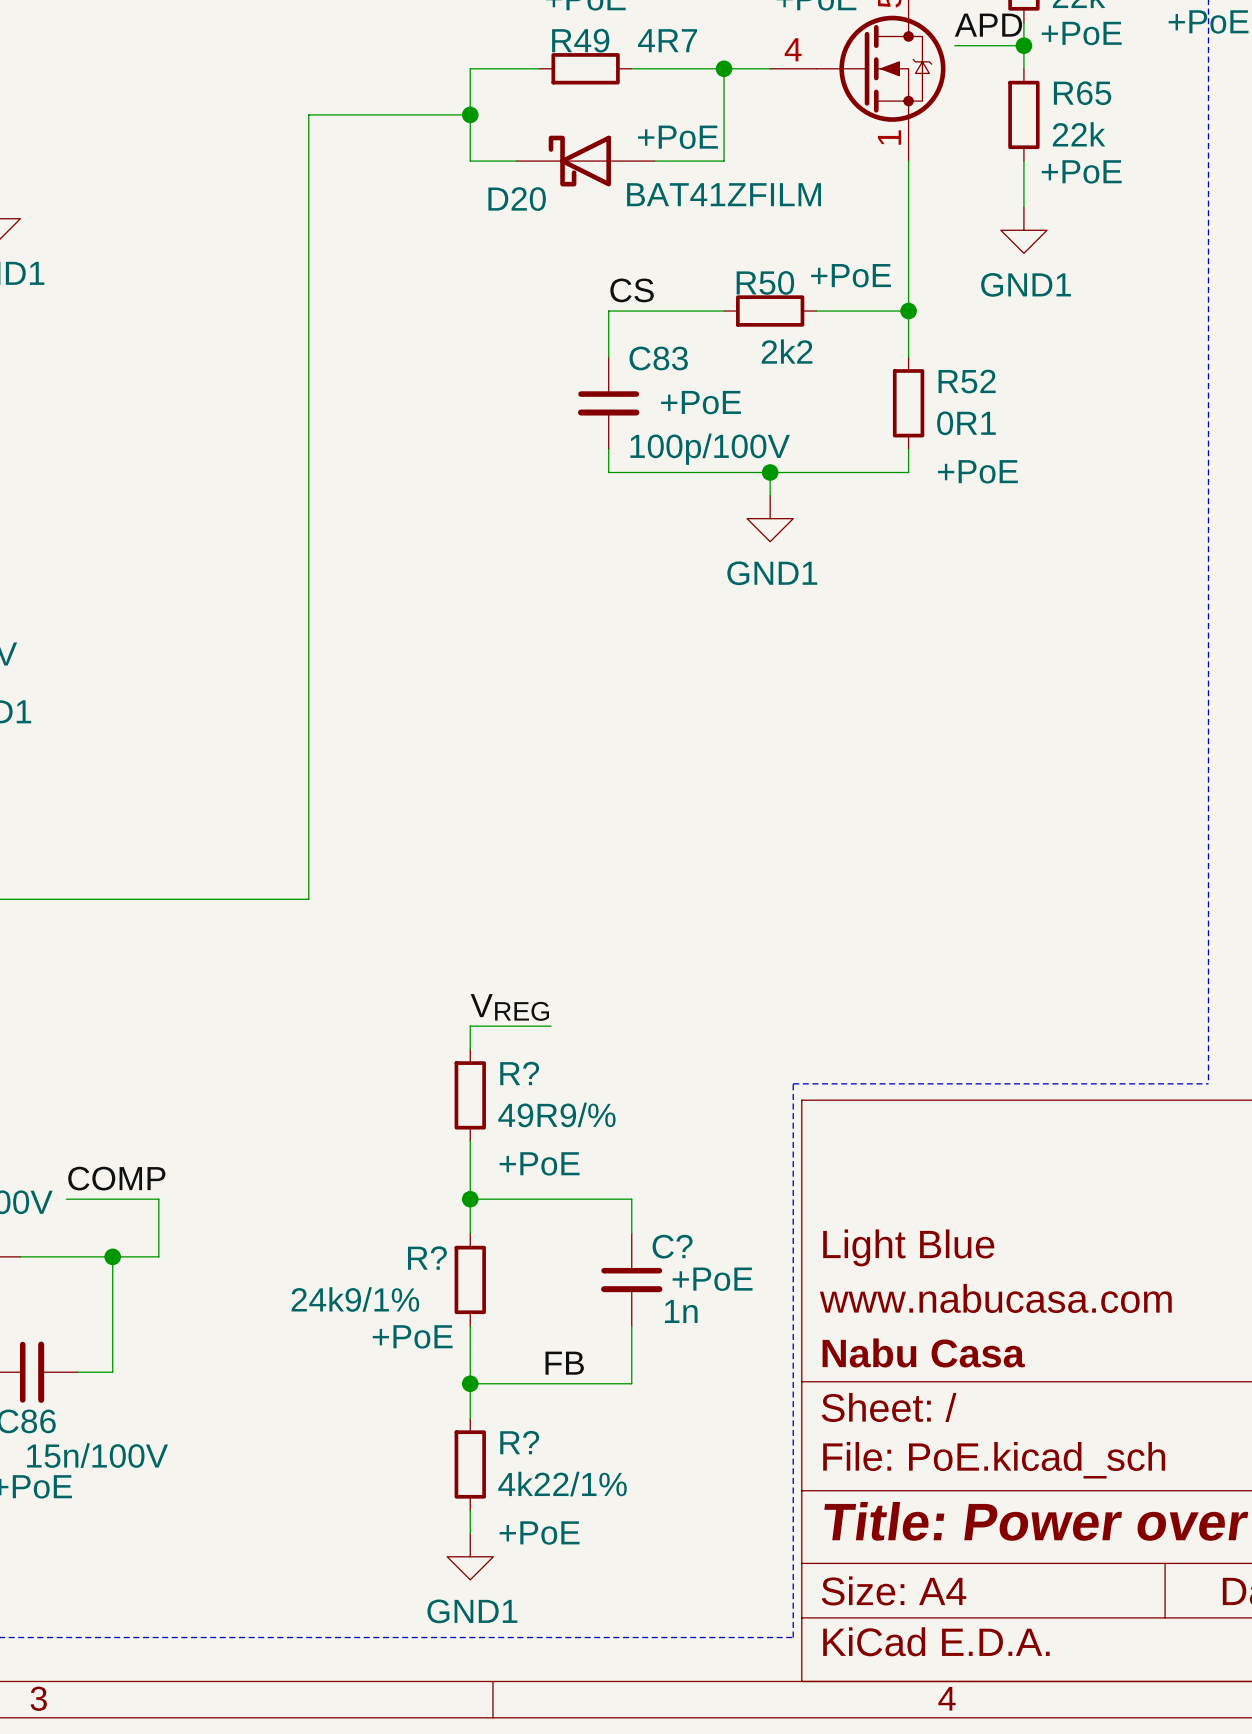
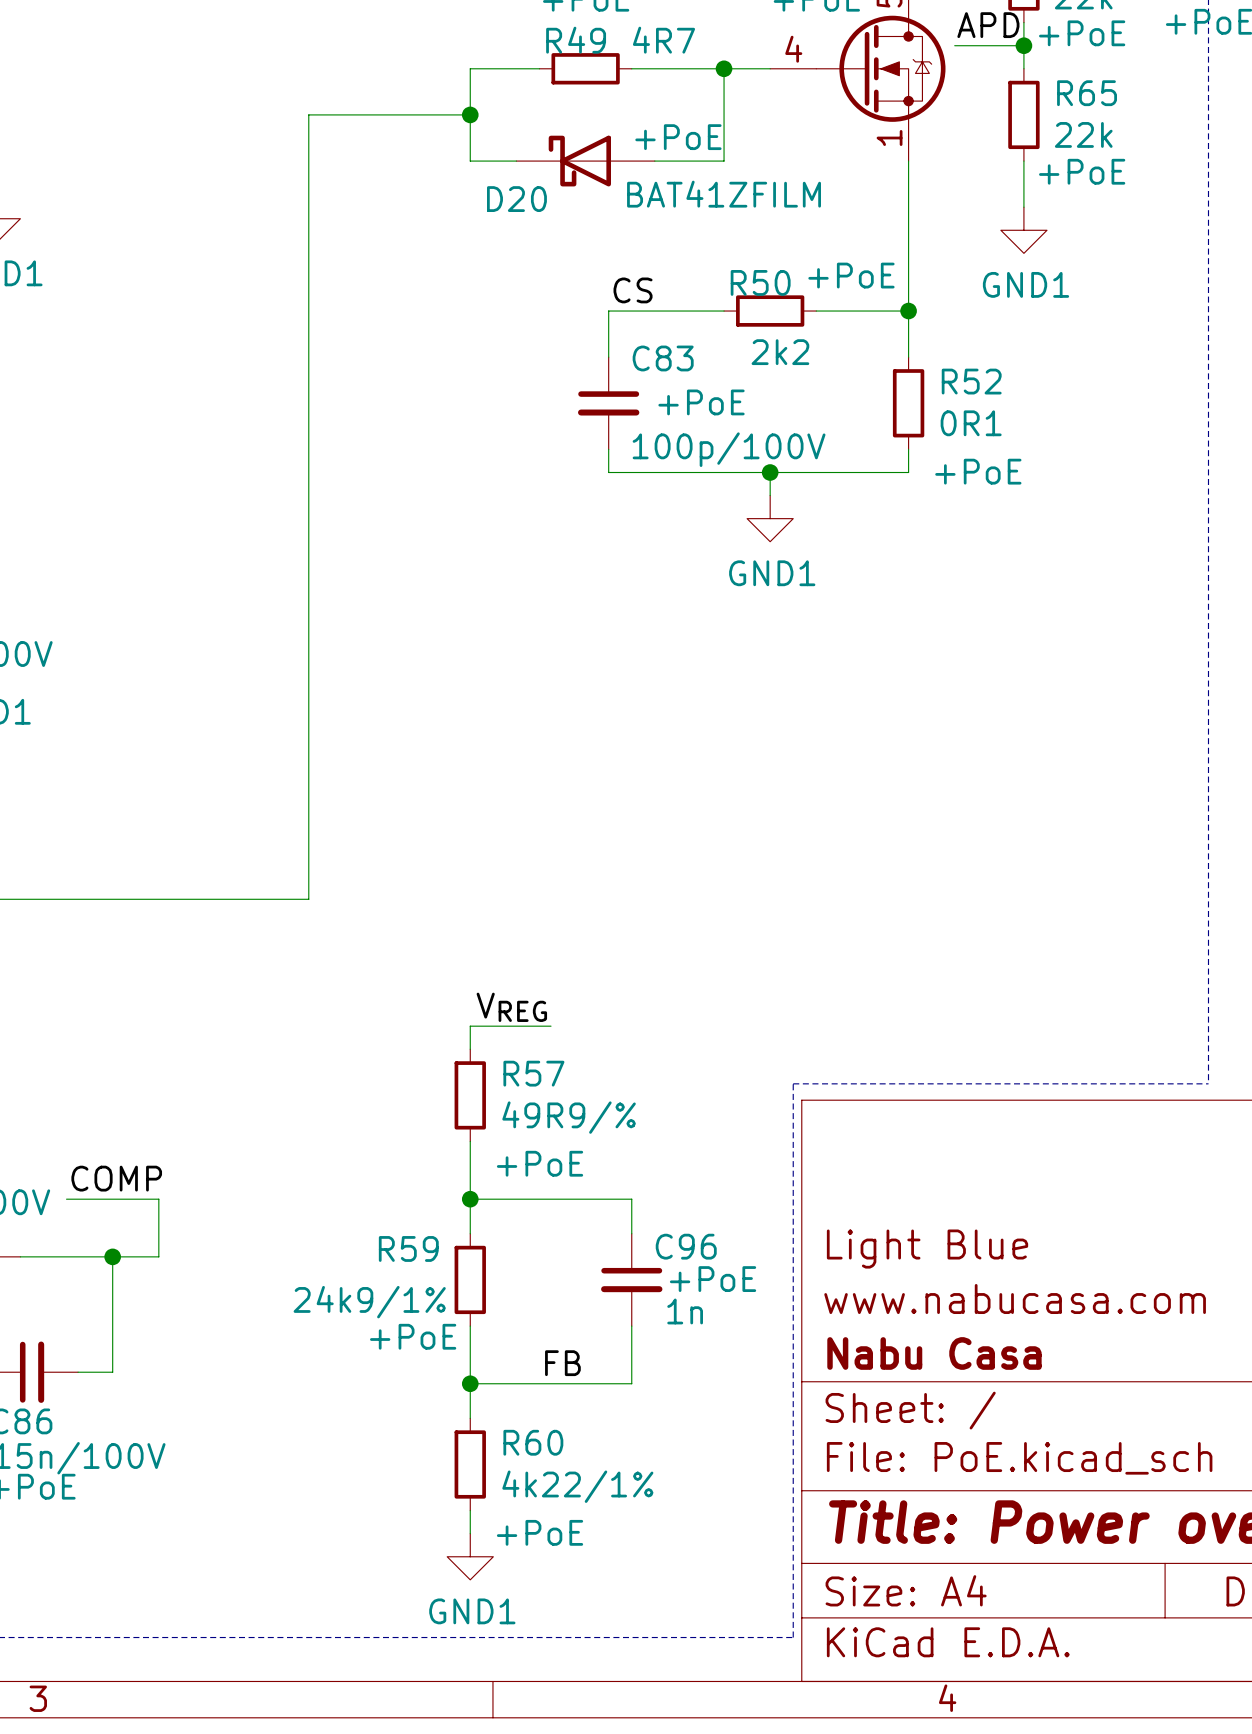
R? name: R? (519, 1073) -> R57 (533, 1073)
C? name: C? (672, 1246) -> C96 (686, 1246)
R? name: R? (427, 1258) -> R59 (408, 1248)
R? name: R? (519, 1442) -> R60 (533, 1442)

